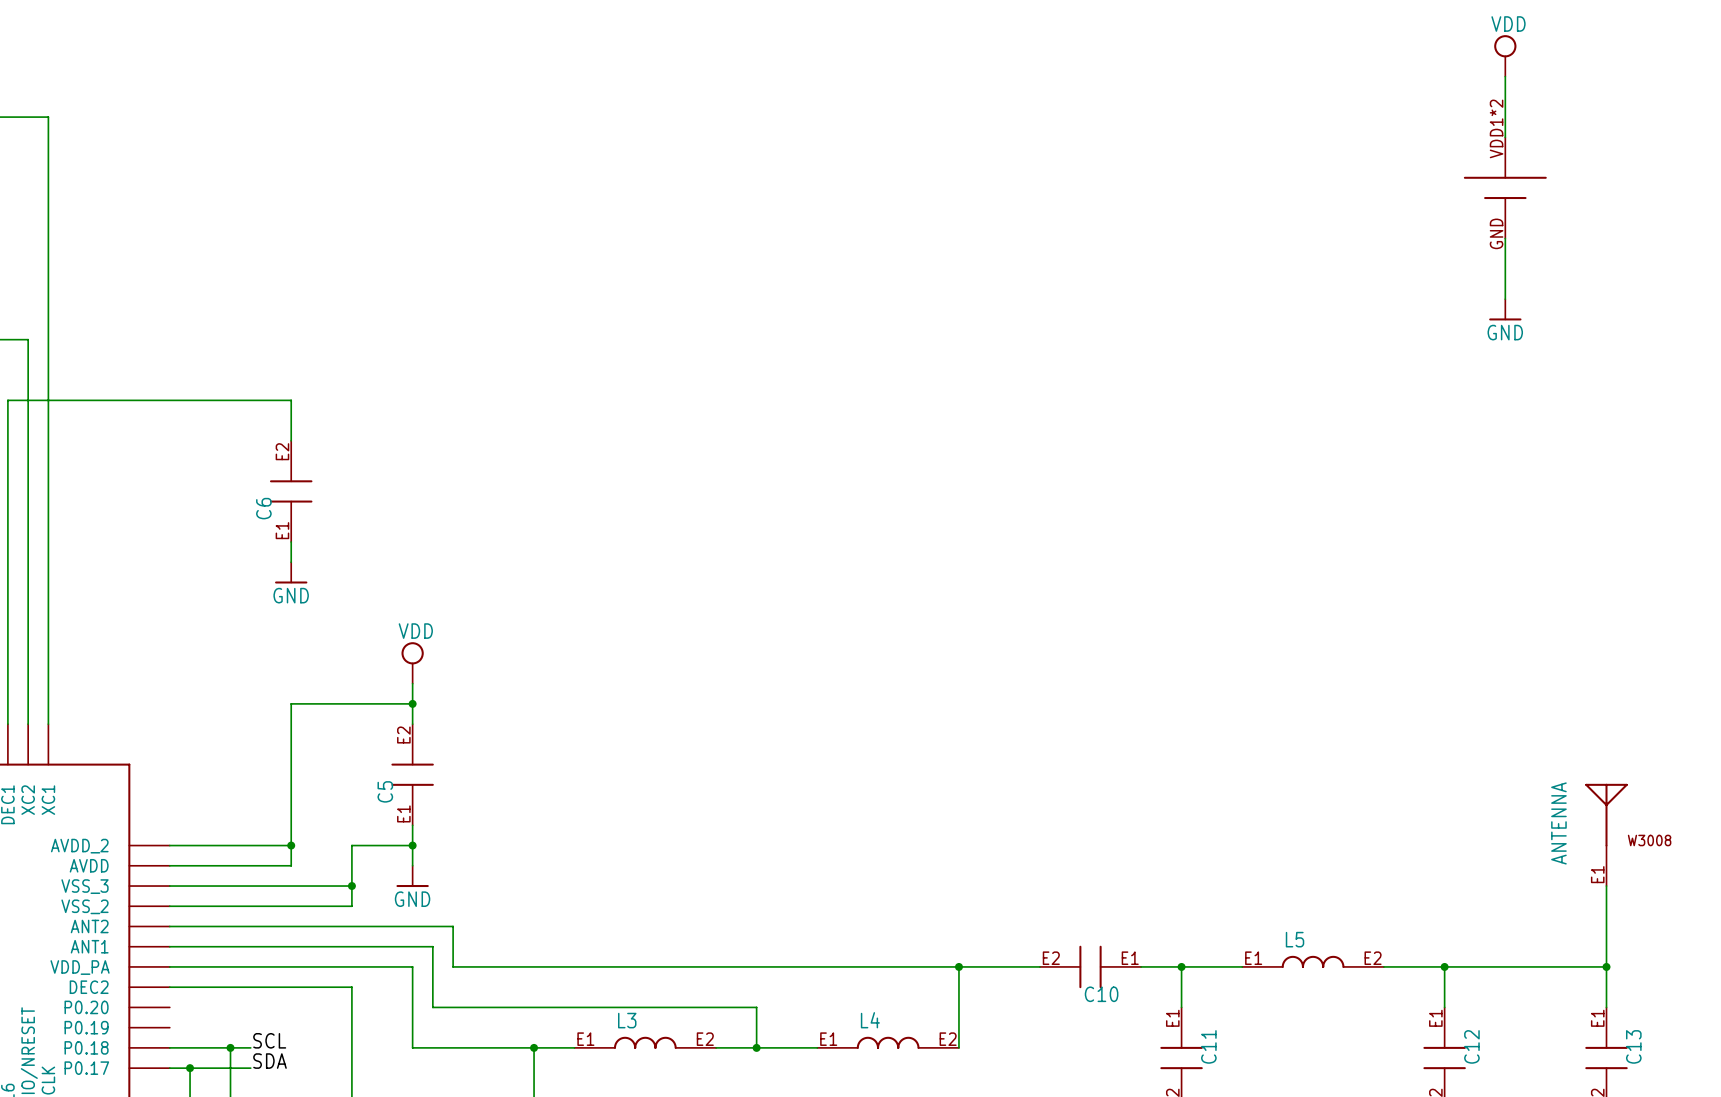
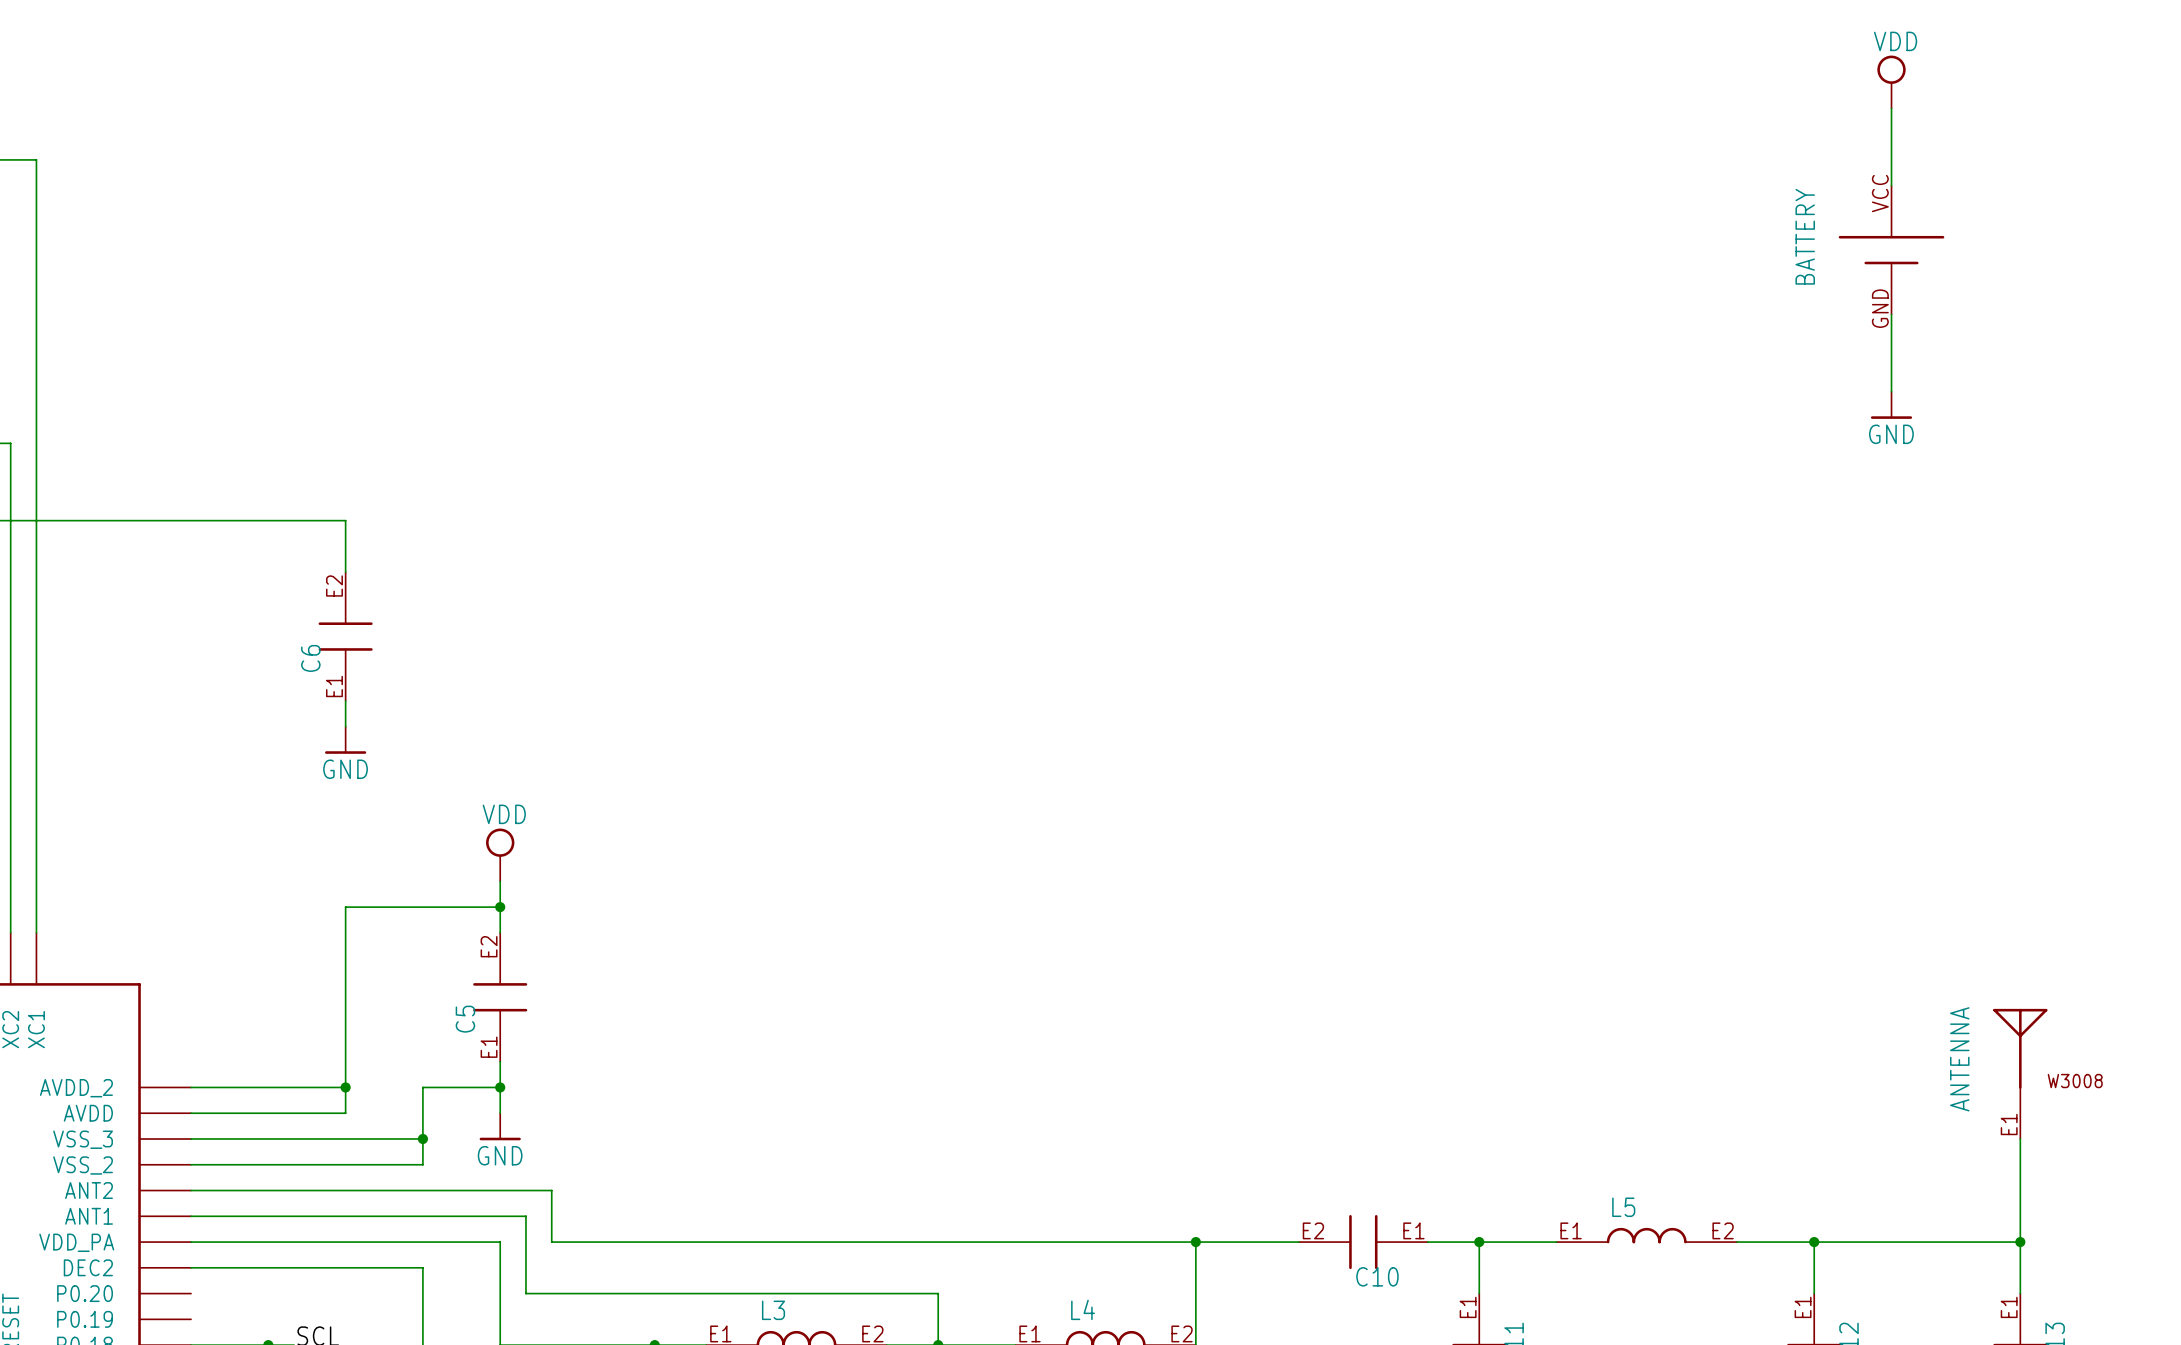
BATTERY pin number: VDD1*2 (1496, 128) -> VCC (1880, 193)
BATTERY name: none -> BATTERY (1805, 236)

